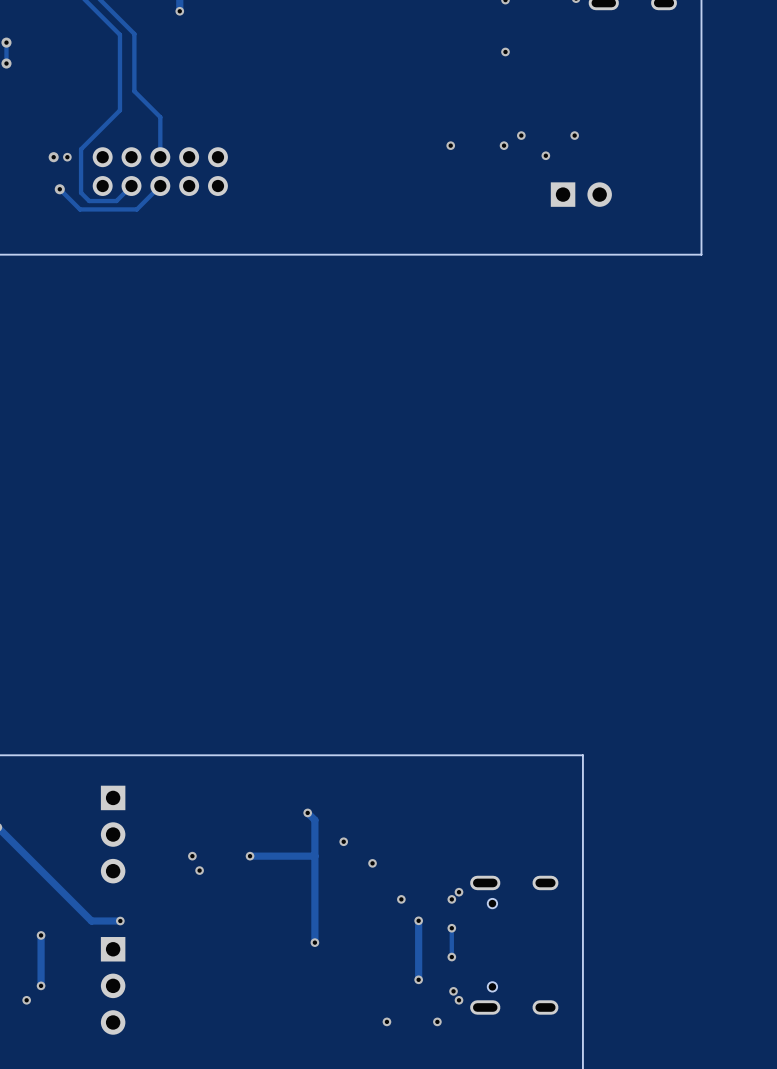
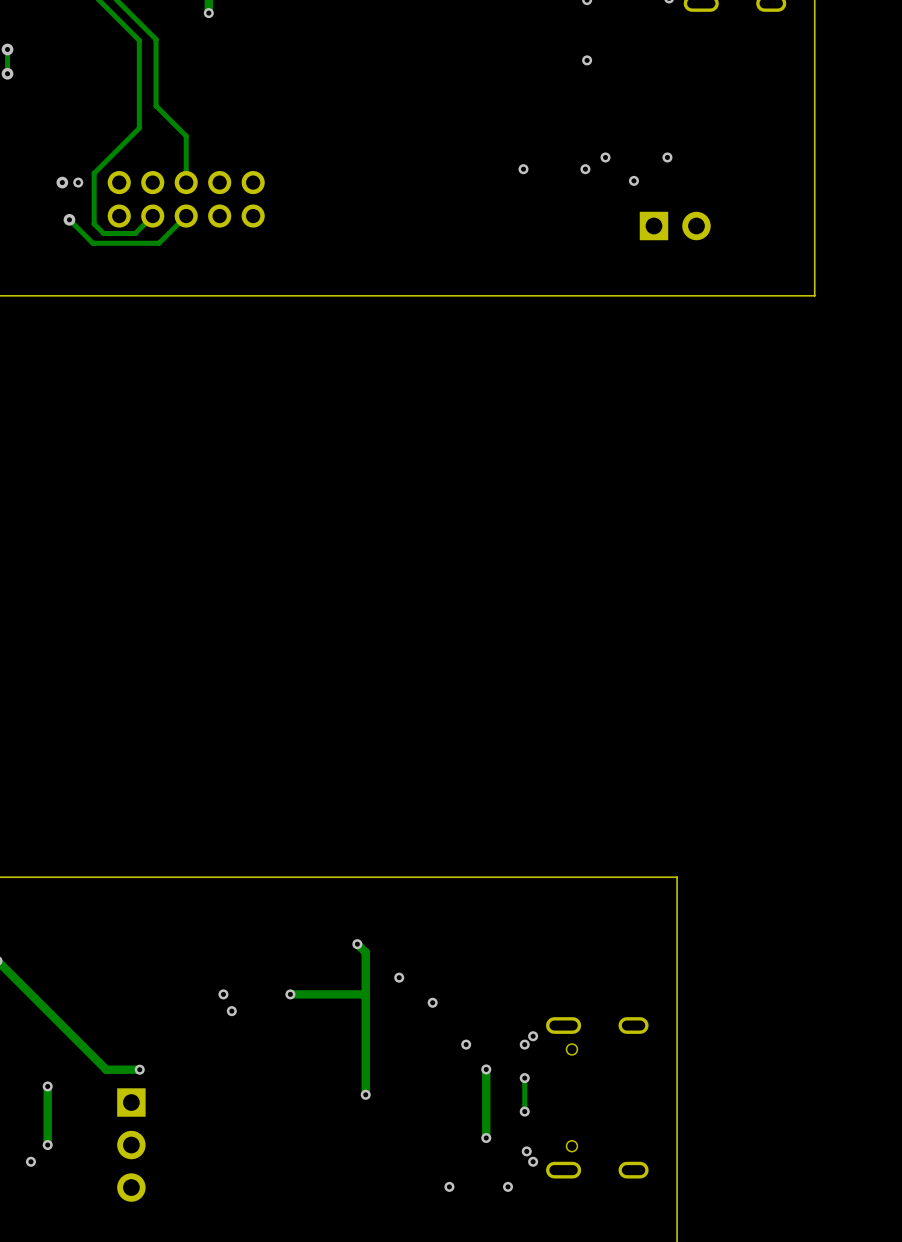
part: (113, 834) -> none

